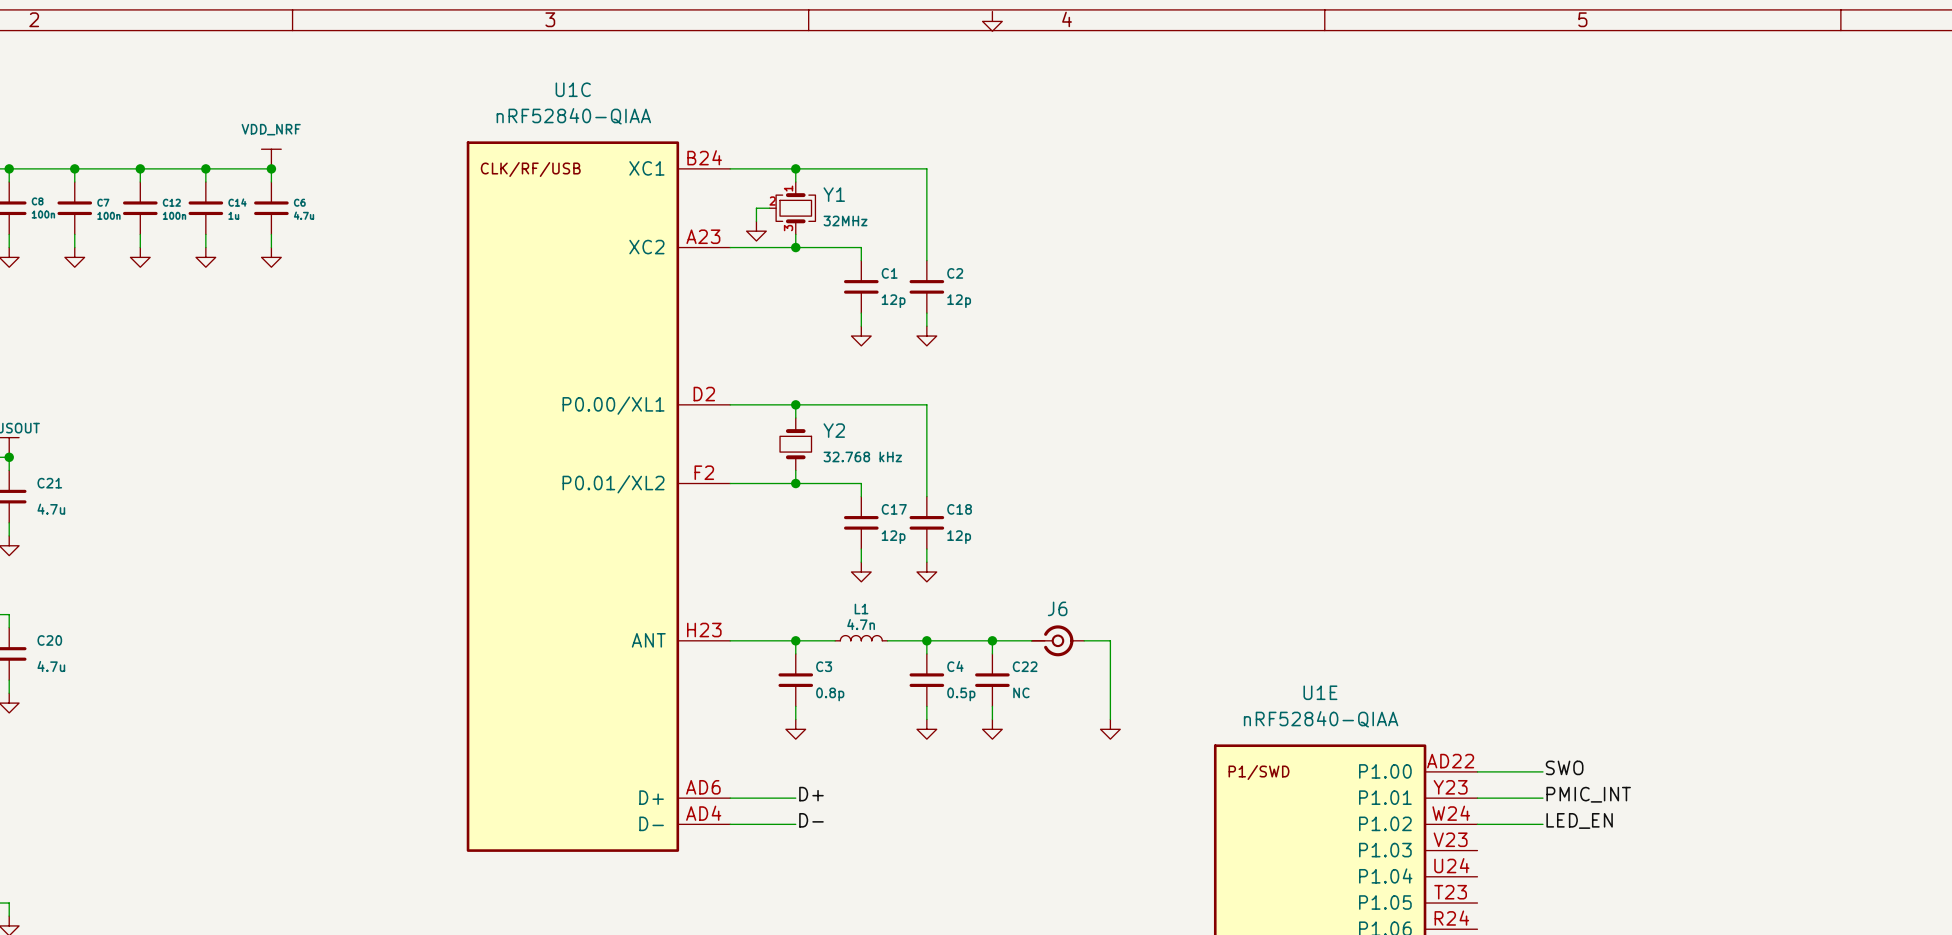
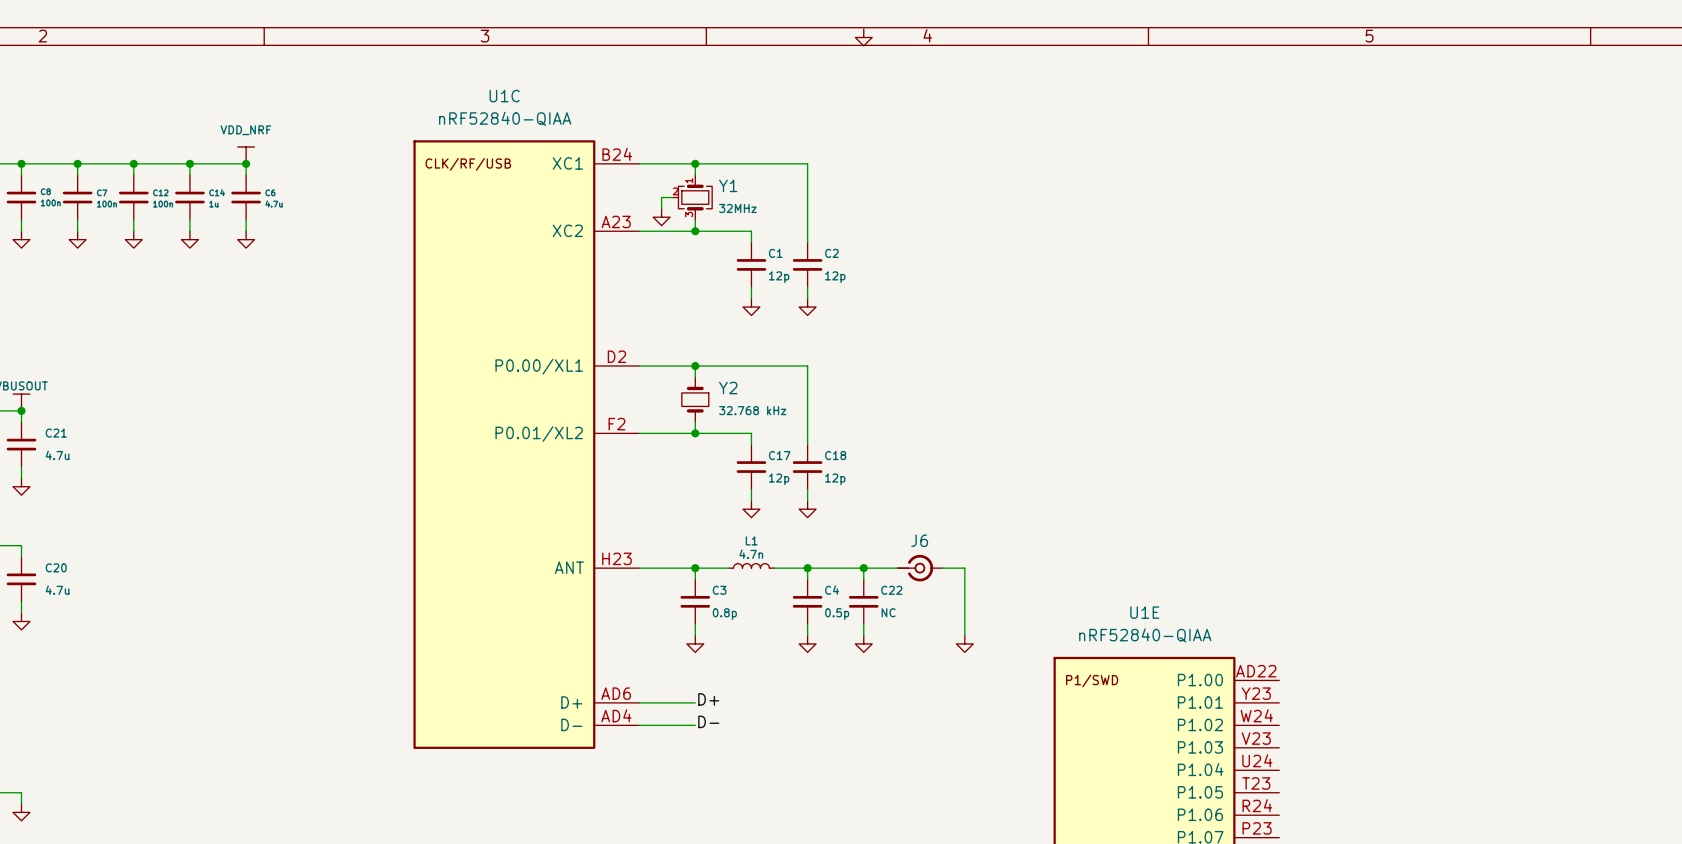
label: SWO (1564, 767) -> none
wire: (1477, 771) (1542, 771) -> none
label: PMIC_INT (1588, 794) -> none
wire: (1477, 798) (1542, 798) -> none
label: LED_EN (1579, 820) -> none
wire: (1477, 824) (1542, 824) -> none

